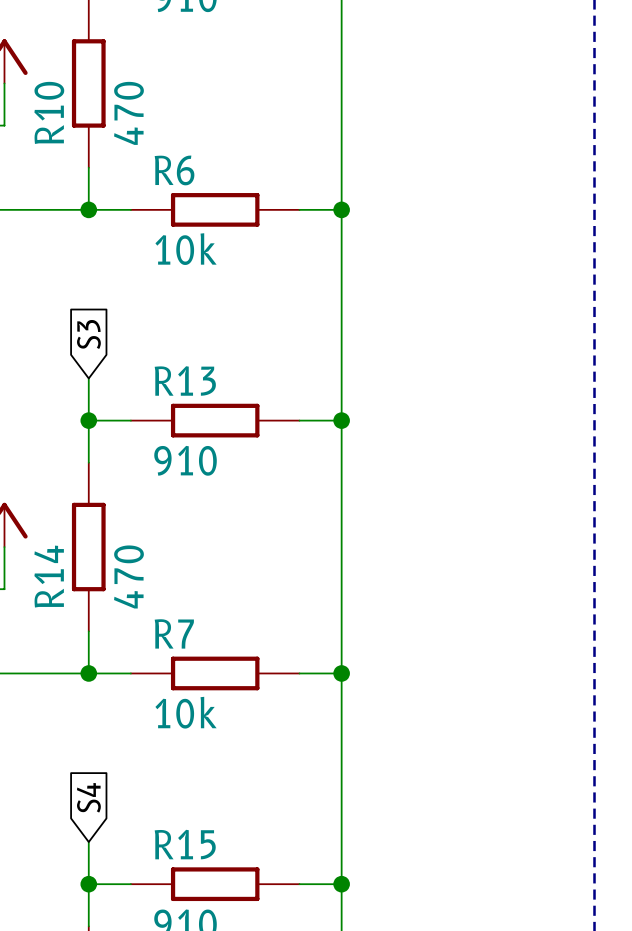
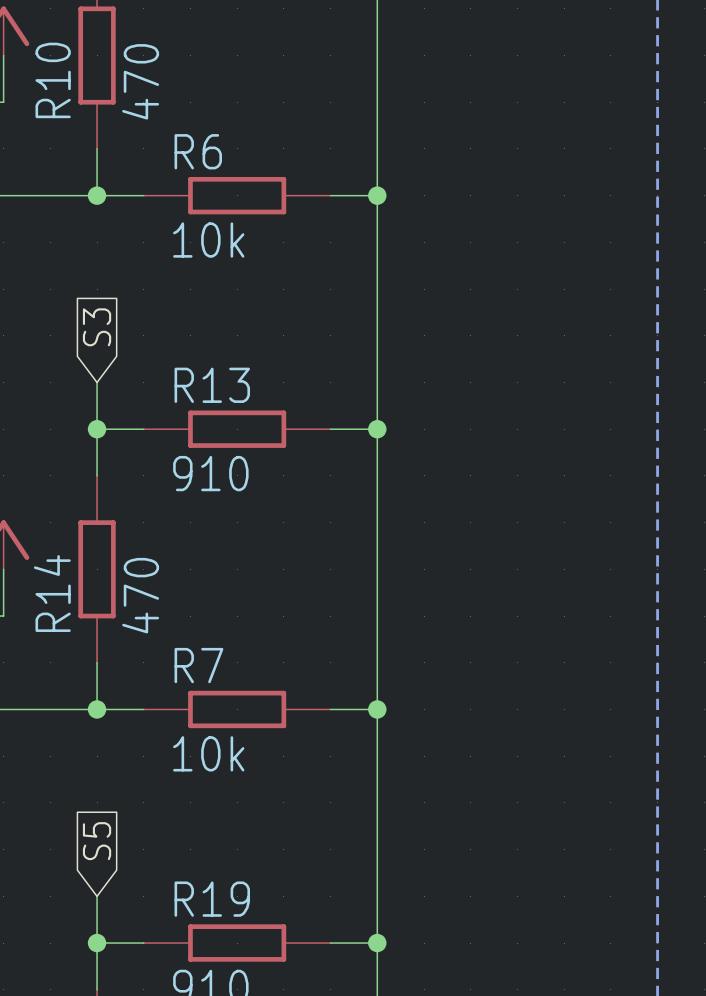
global label: S4 (88, 797) -> S5 (97, 841)
R15 name: R15 (185, 844) -> R19 (212, 899)

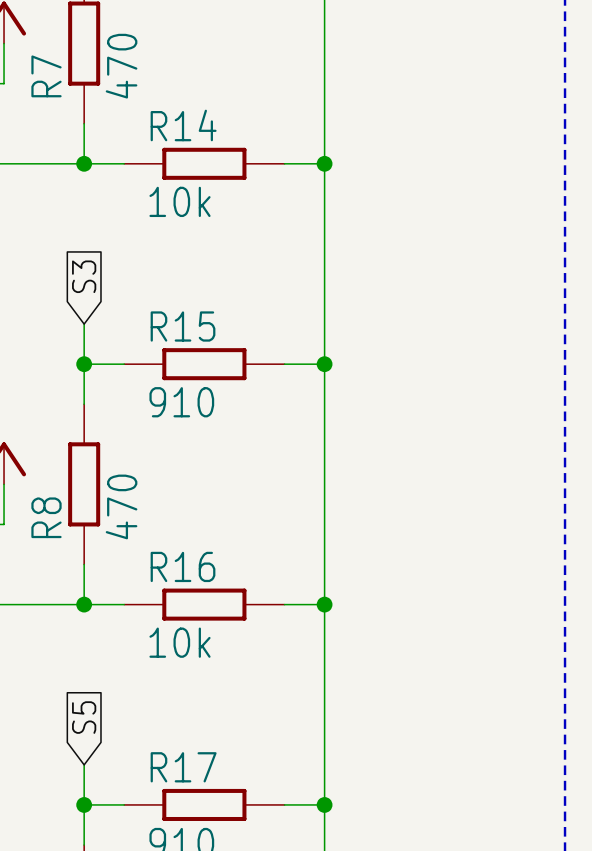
R10 name: R10 (53, 80) -> R7 (46, 76)
R6 name: R6 (198, 151) -> R14 (183, 125)
R13 name: R13 (212, 385) -> R15 (183, 326)
R14 name: R14 (52, 593) -> R8 (46, 517)
R7 name: R7 (198, 665) -> R16 (183, 566)
R19 name: R19 (212, 899) -> R17 (183, 767)

